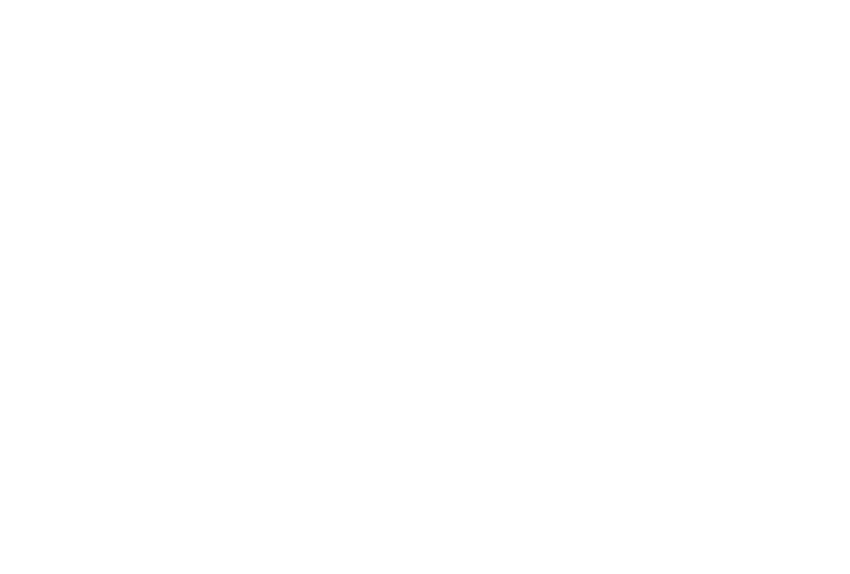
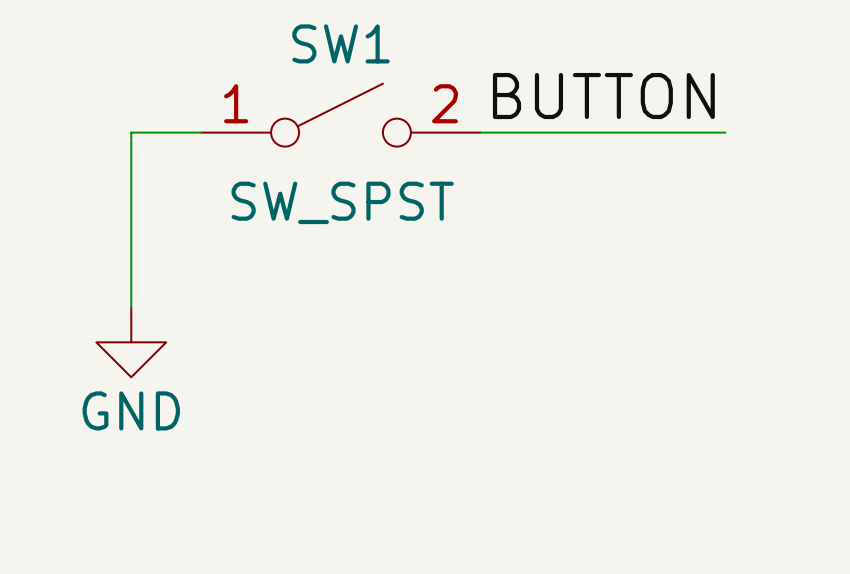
label: none -> BUTTON (603, 96)
SW1: none -> SW_SPST (340, 115)
wire: none -> (201, 132) (131, 132) (131, 307)
wire: none -> (480, 132) (725, 132)
power symbol: none -> GND (131, 342)

